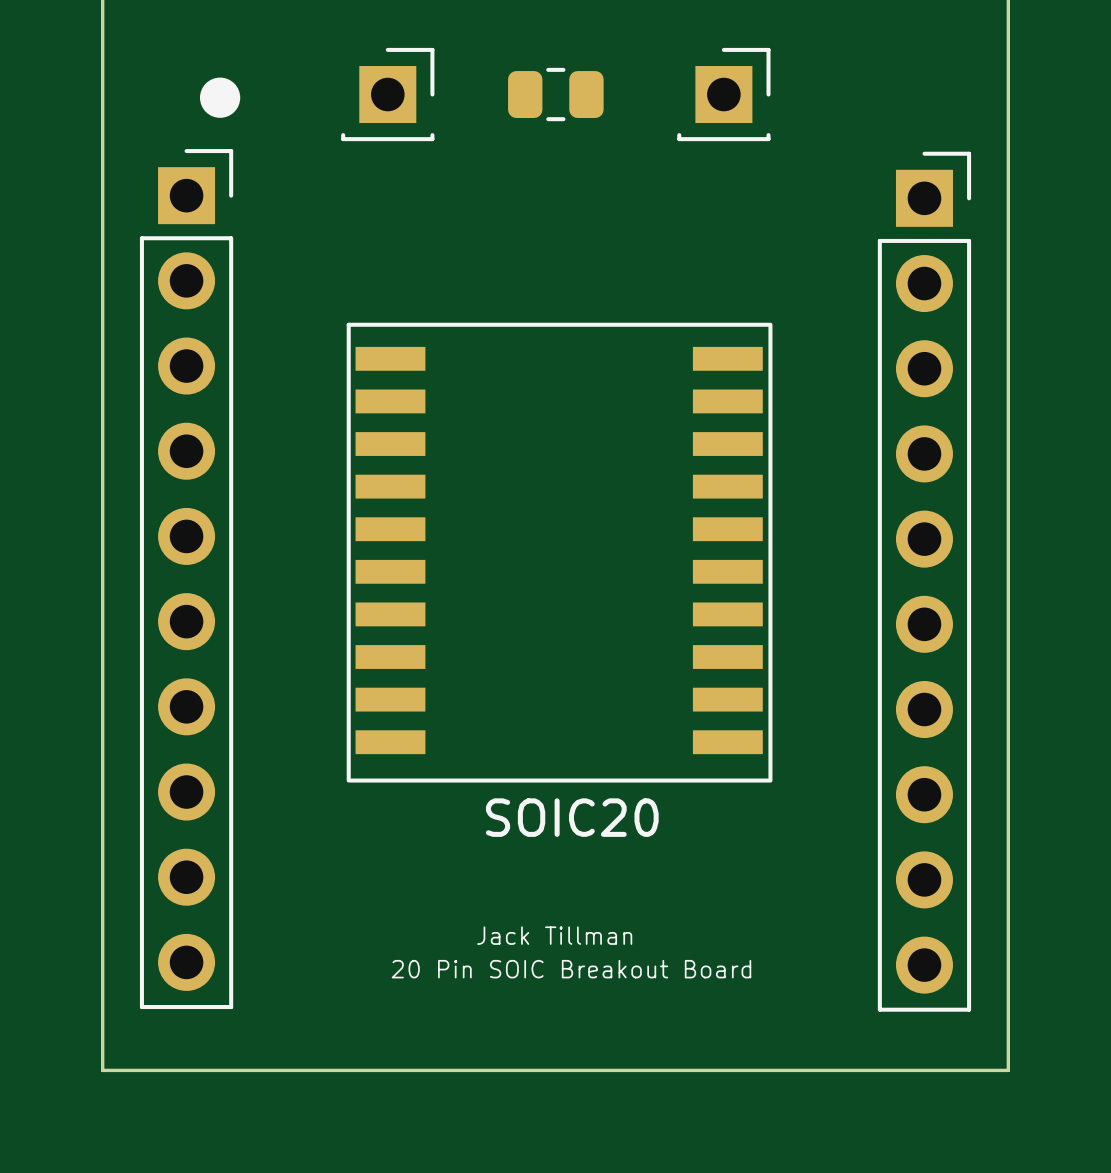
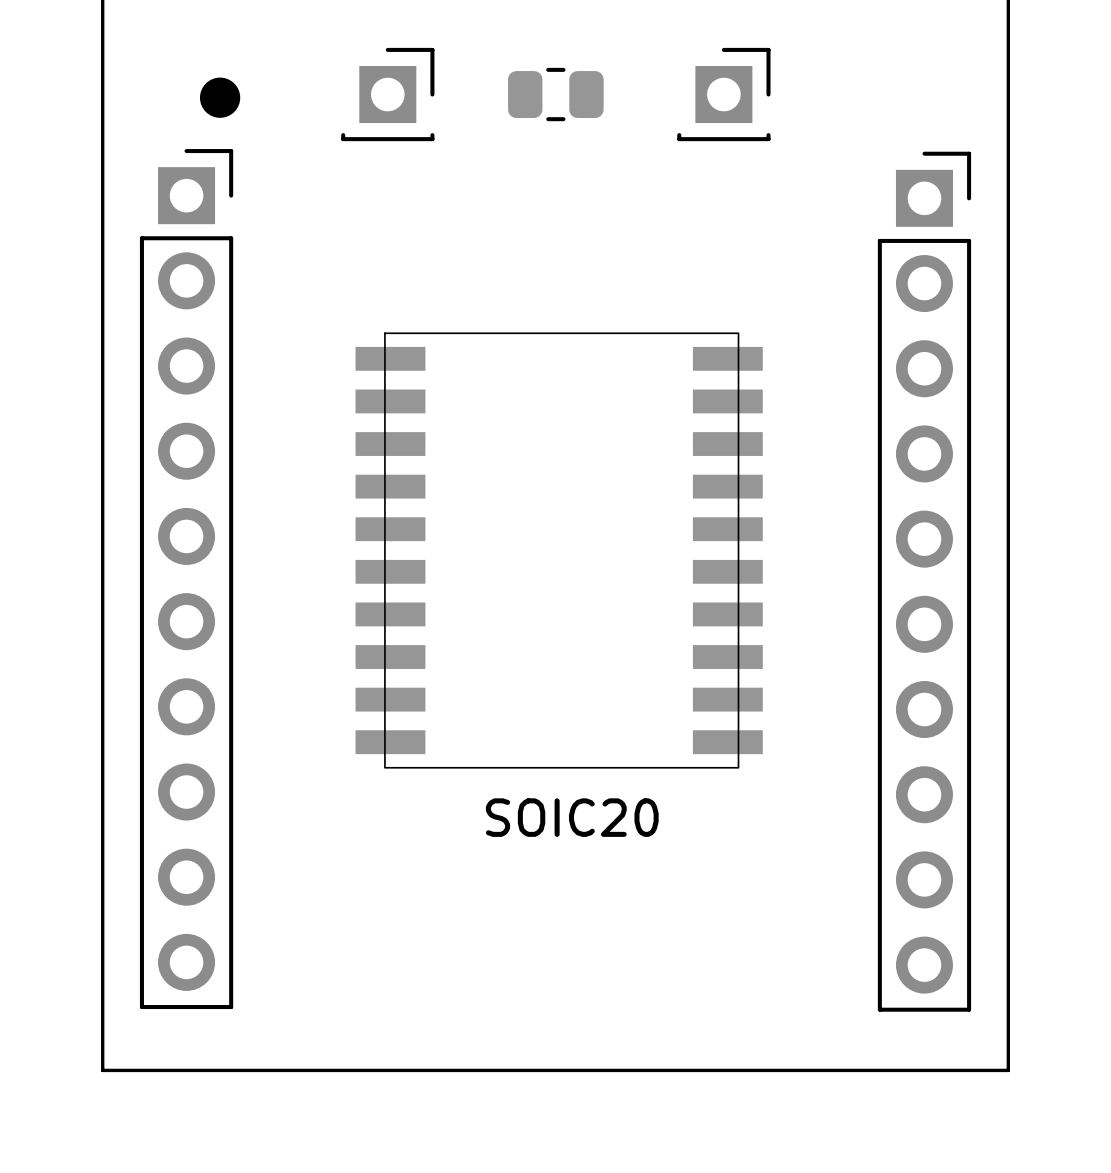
SOIC20 footprint: [346, 322, 773, 783] -> [355, 332, 763, 769]
text: Jack Tillman (554, 935) -> none
text: 20 Pin SOIC Breakout Board (571, 969) -> none

